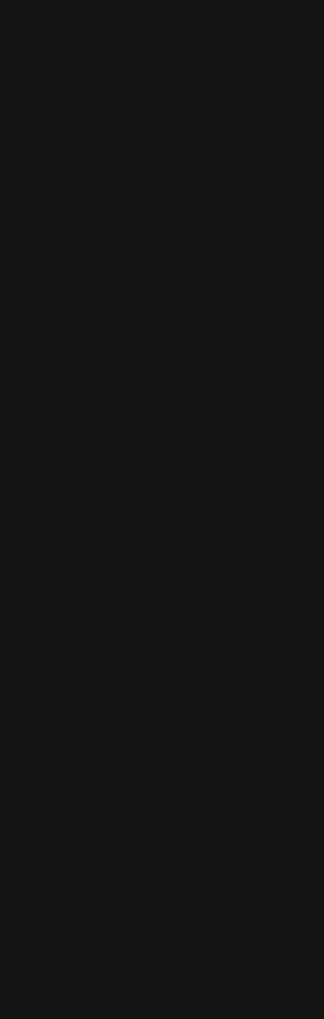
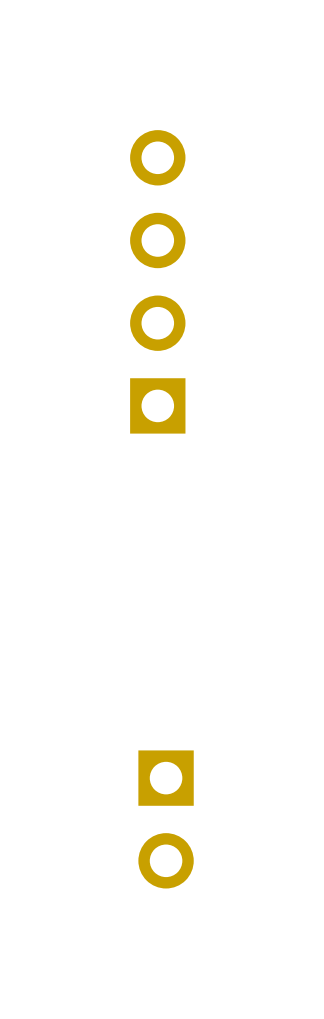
part: none -> (157, 281)
part: none -> (166, 819)

